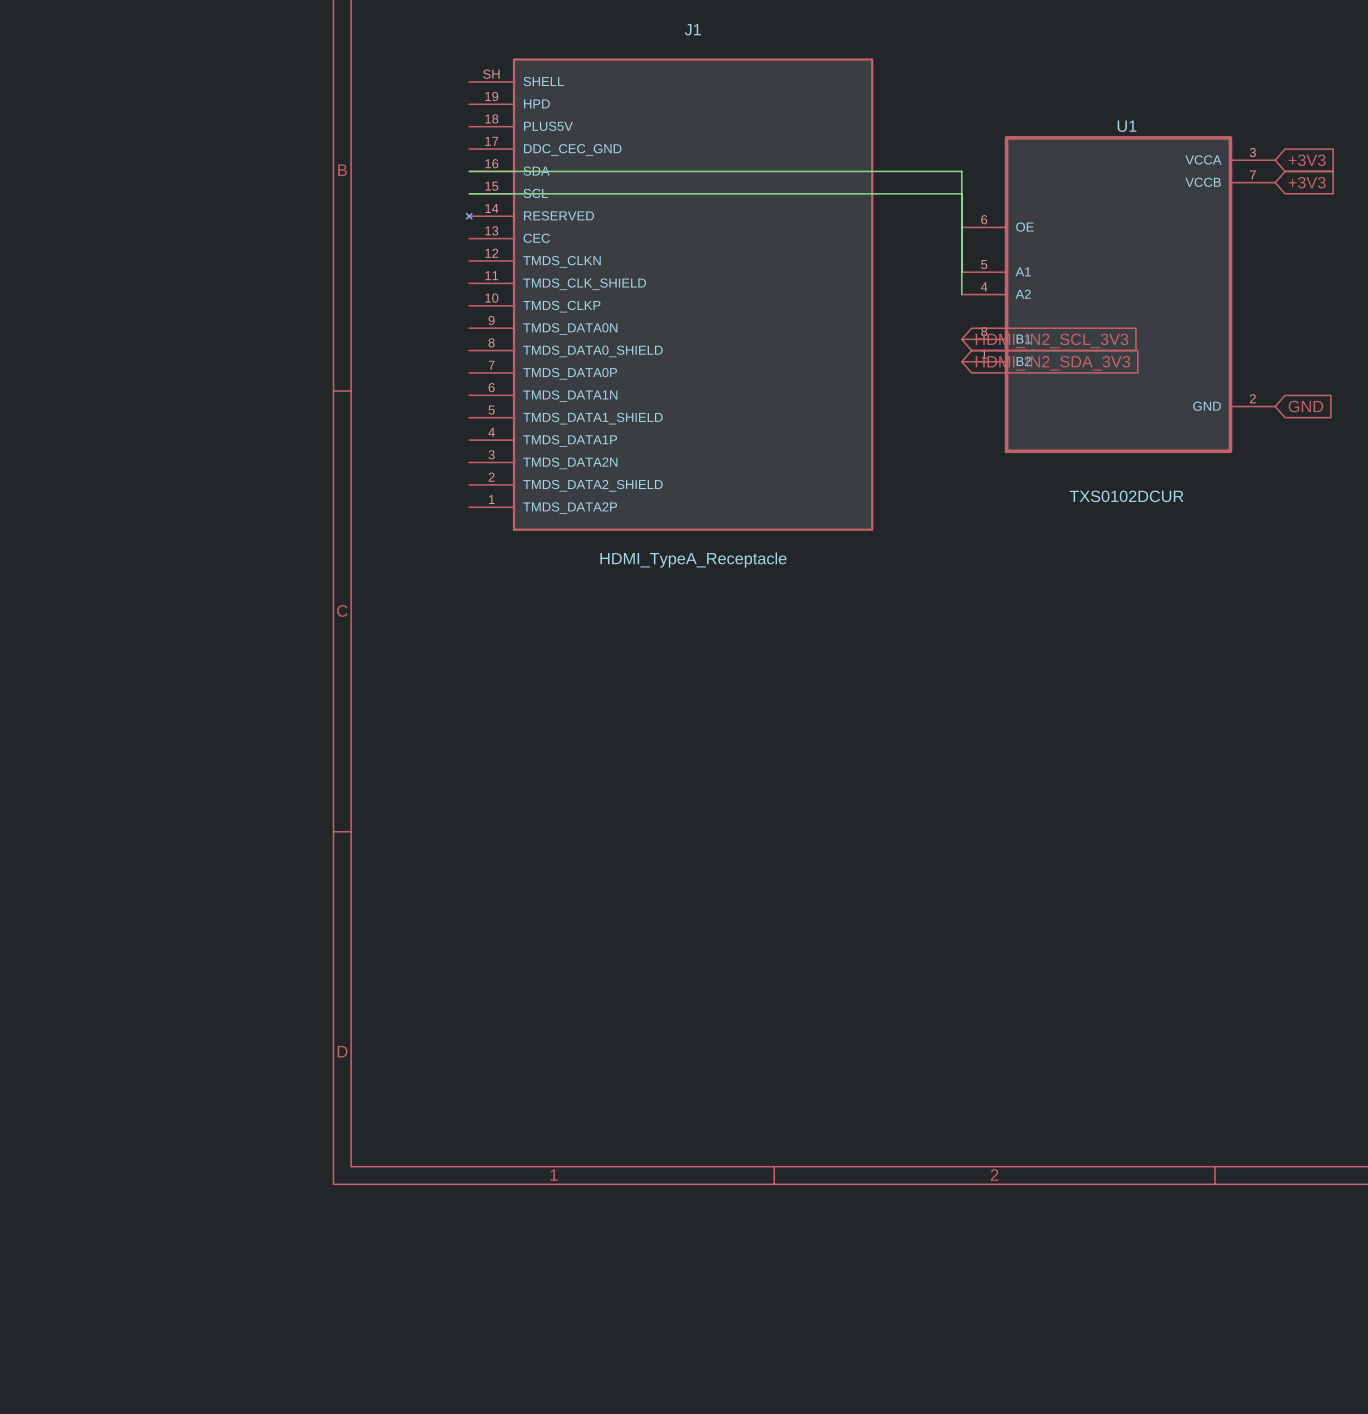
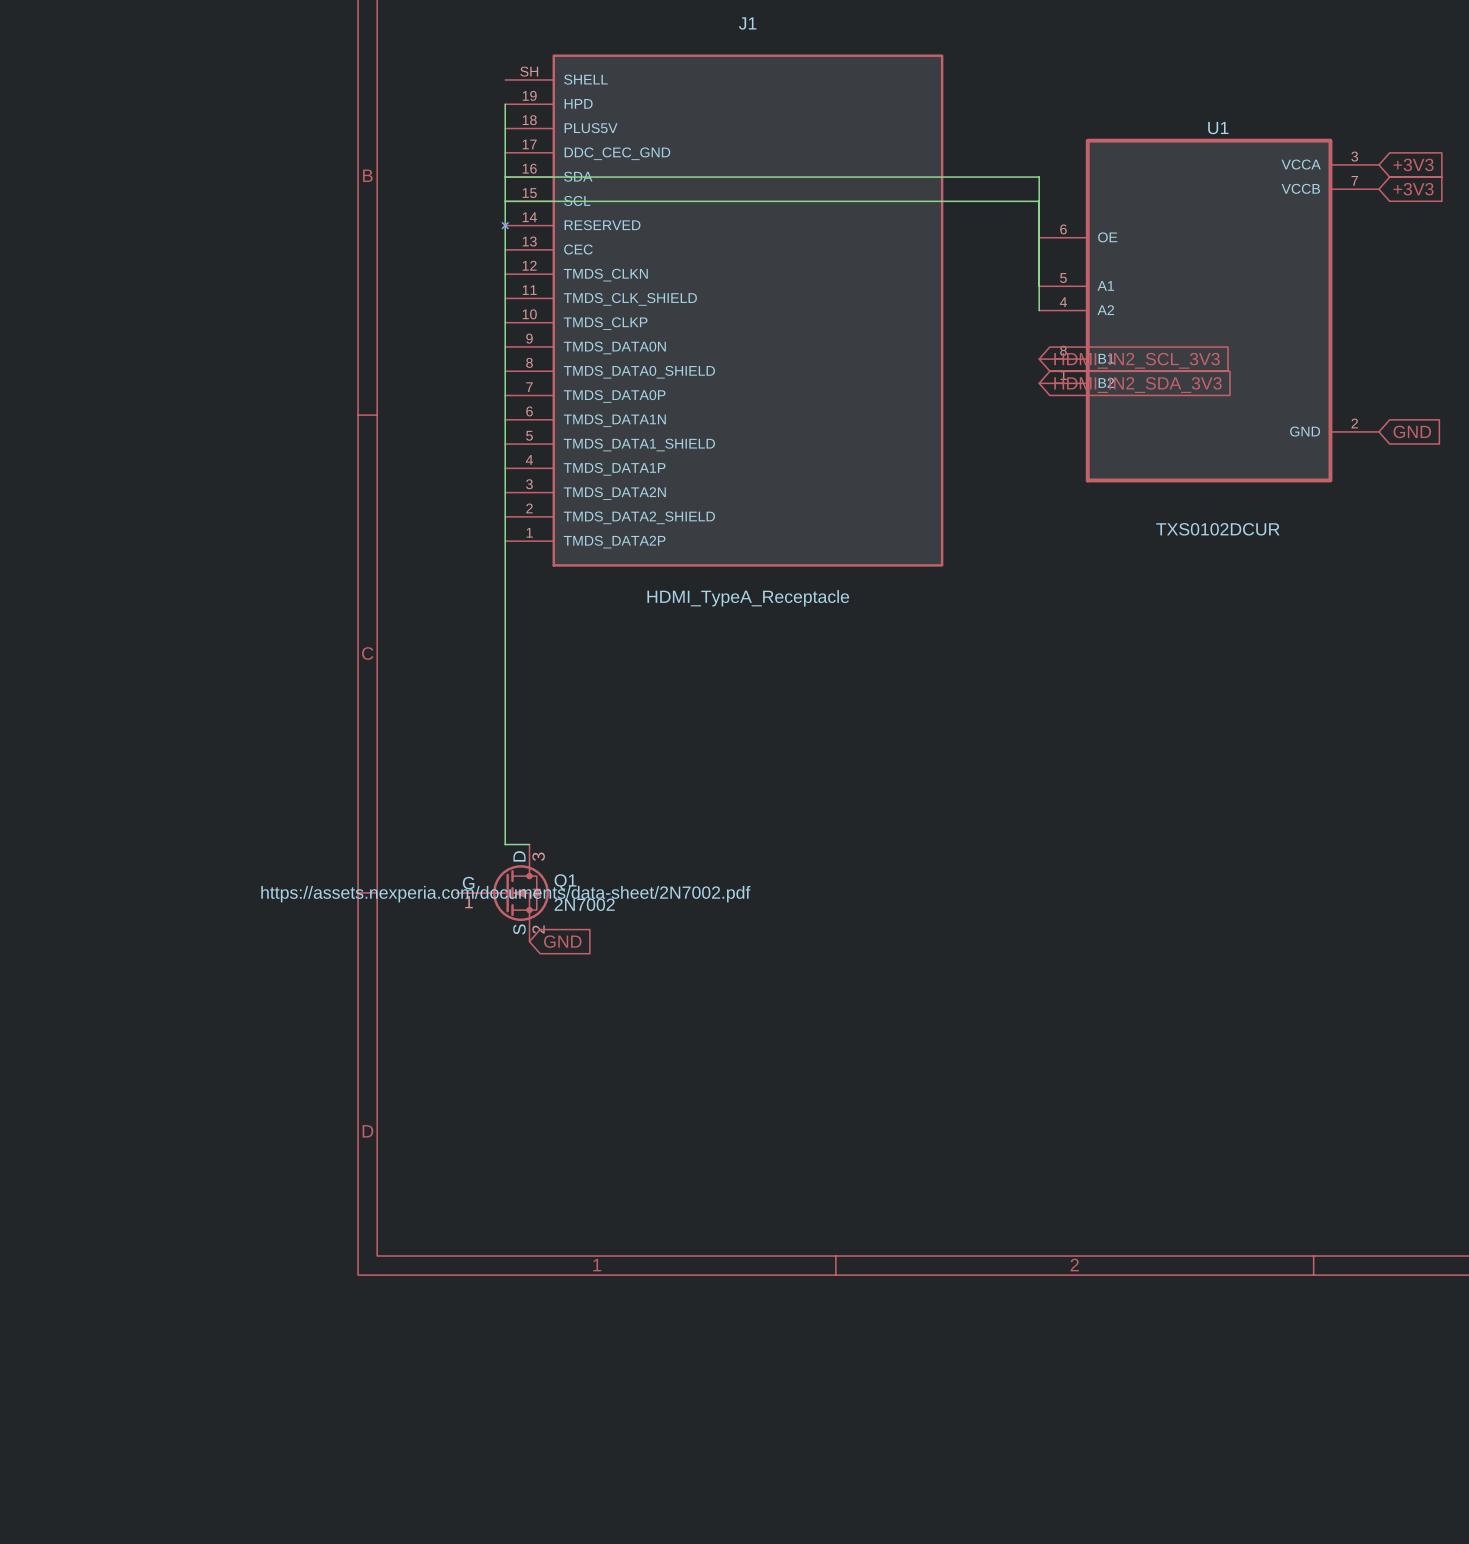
wire: none -> (505, 104) (505, 844) (529, 844)
Q1: none -> 2N7002 (502, 893)
global label: none -> GND (562, 941)

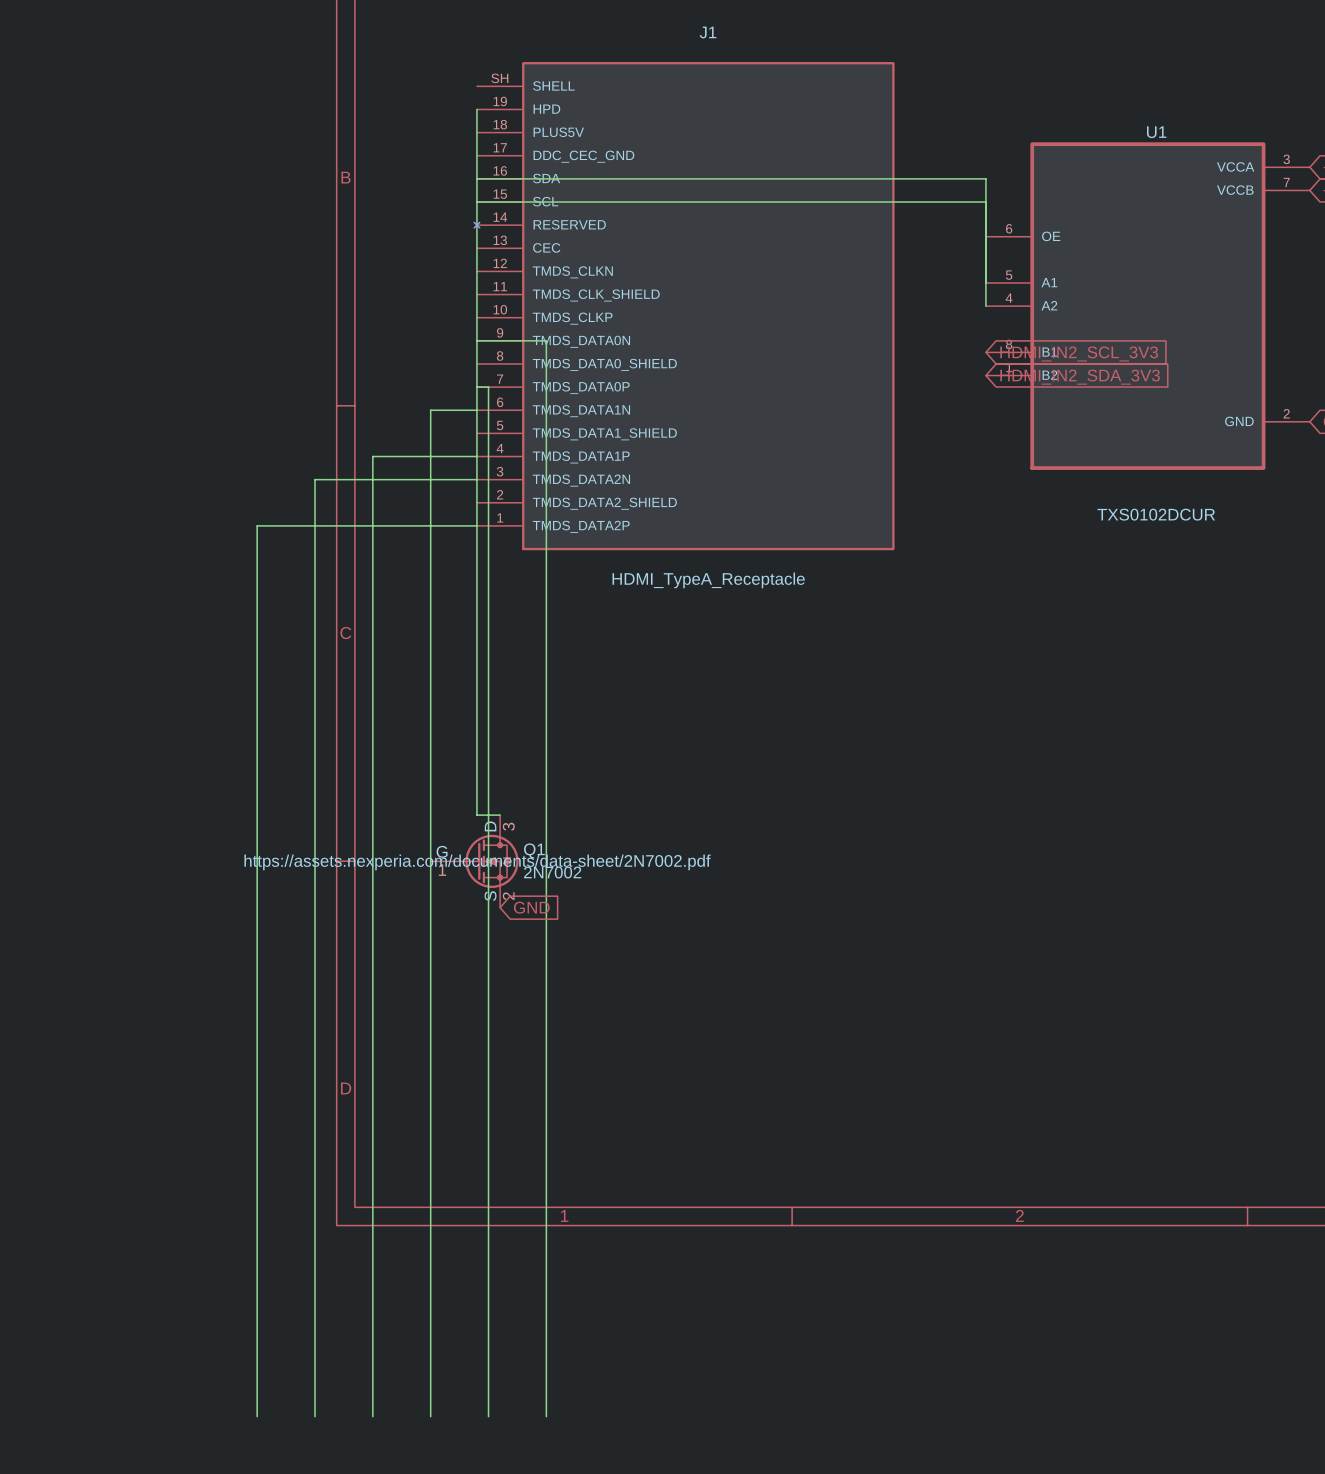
wire: none -> (476, 340) (546, 340) (546, 1416)
wire: none -> (476, 387) (488, 387) (488, 1416)
wire: none -> (476, 410) (430, 410) (430, 1416)
wire: none -> (476, 456) (372, 456) (372, 1416)
wire: none -> (476, 479) (315, 479) (315, 1416)
wire: none -> (476, 525) (257, 525) (257, 1416)

